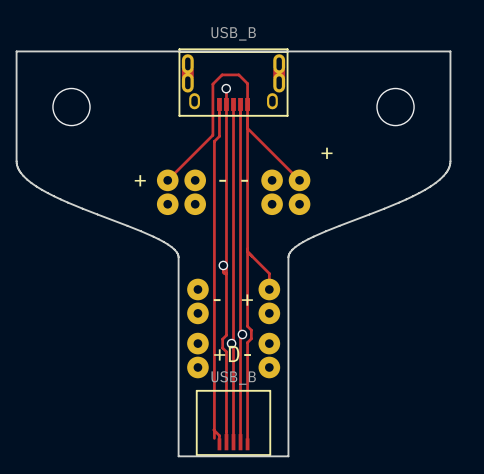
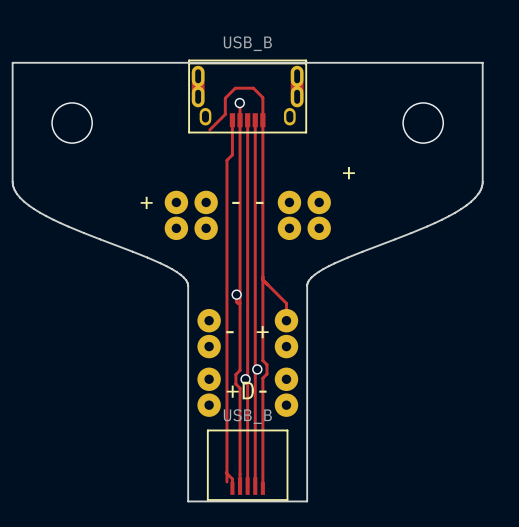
track: (212, 99) (212, 135) (167, 180) -> (225, 114) (209, 129)
track: (247, 128) (299, 180) -> none

